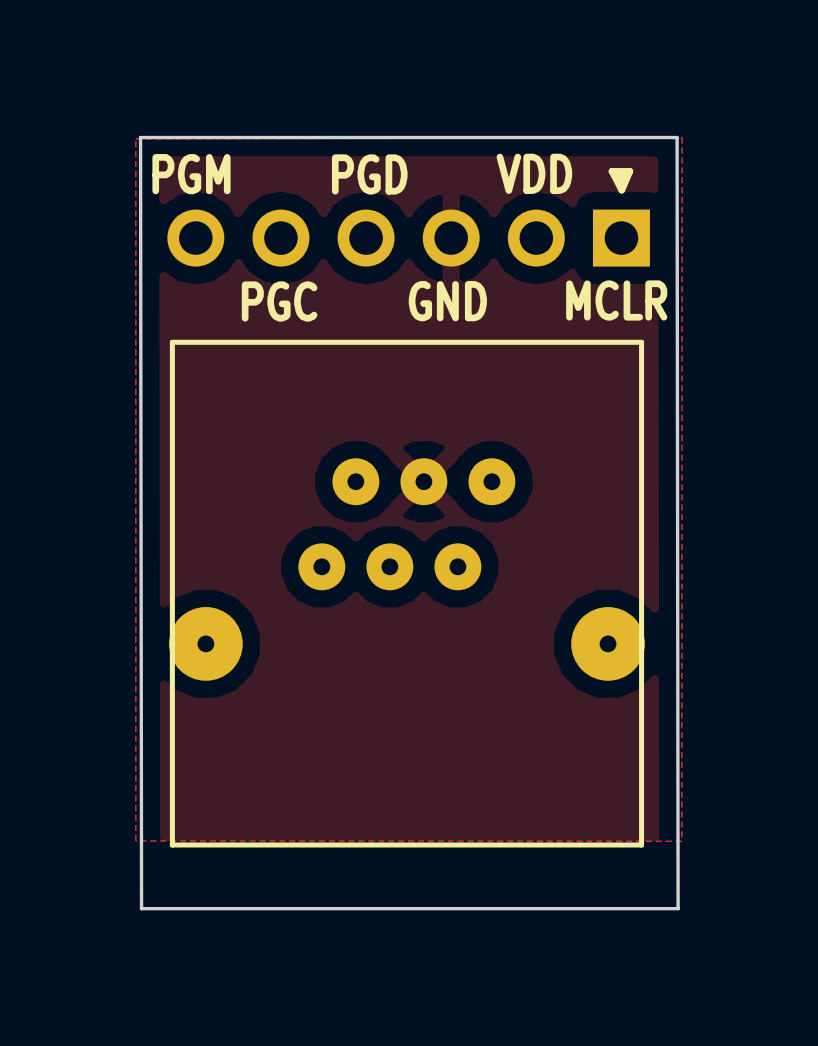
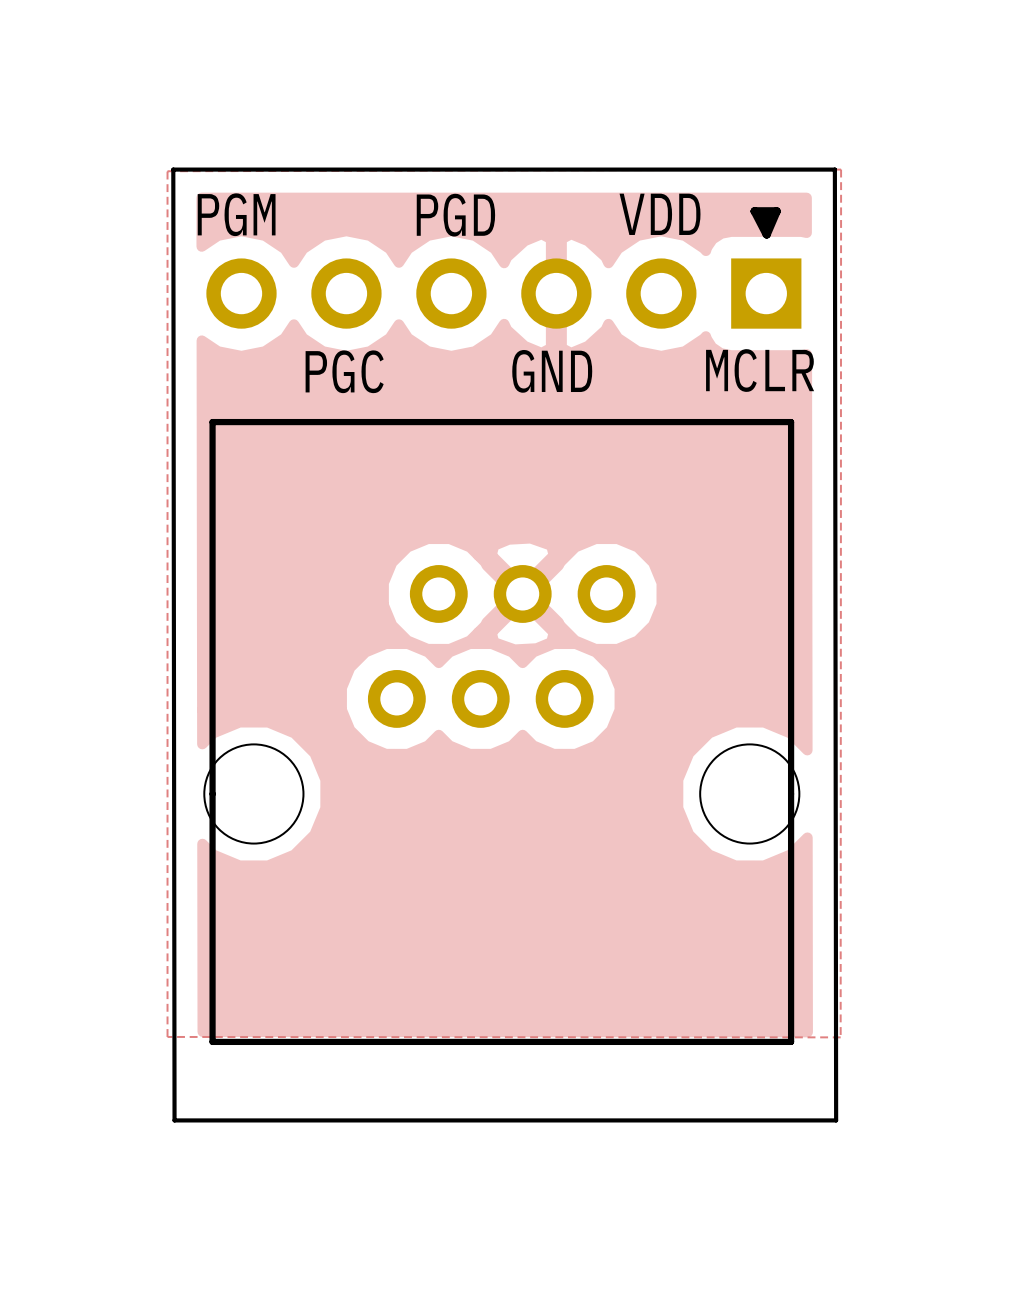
part footprint: [169, 339, 645, 848] -> [204, 418, 800, 1046]

